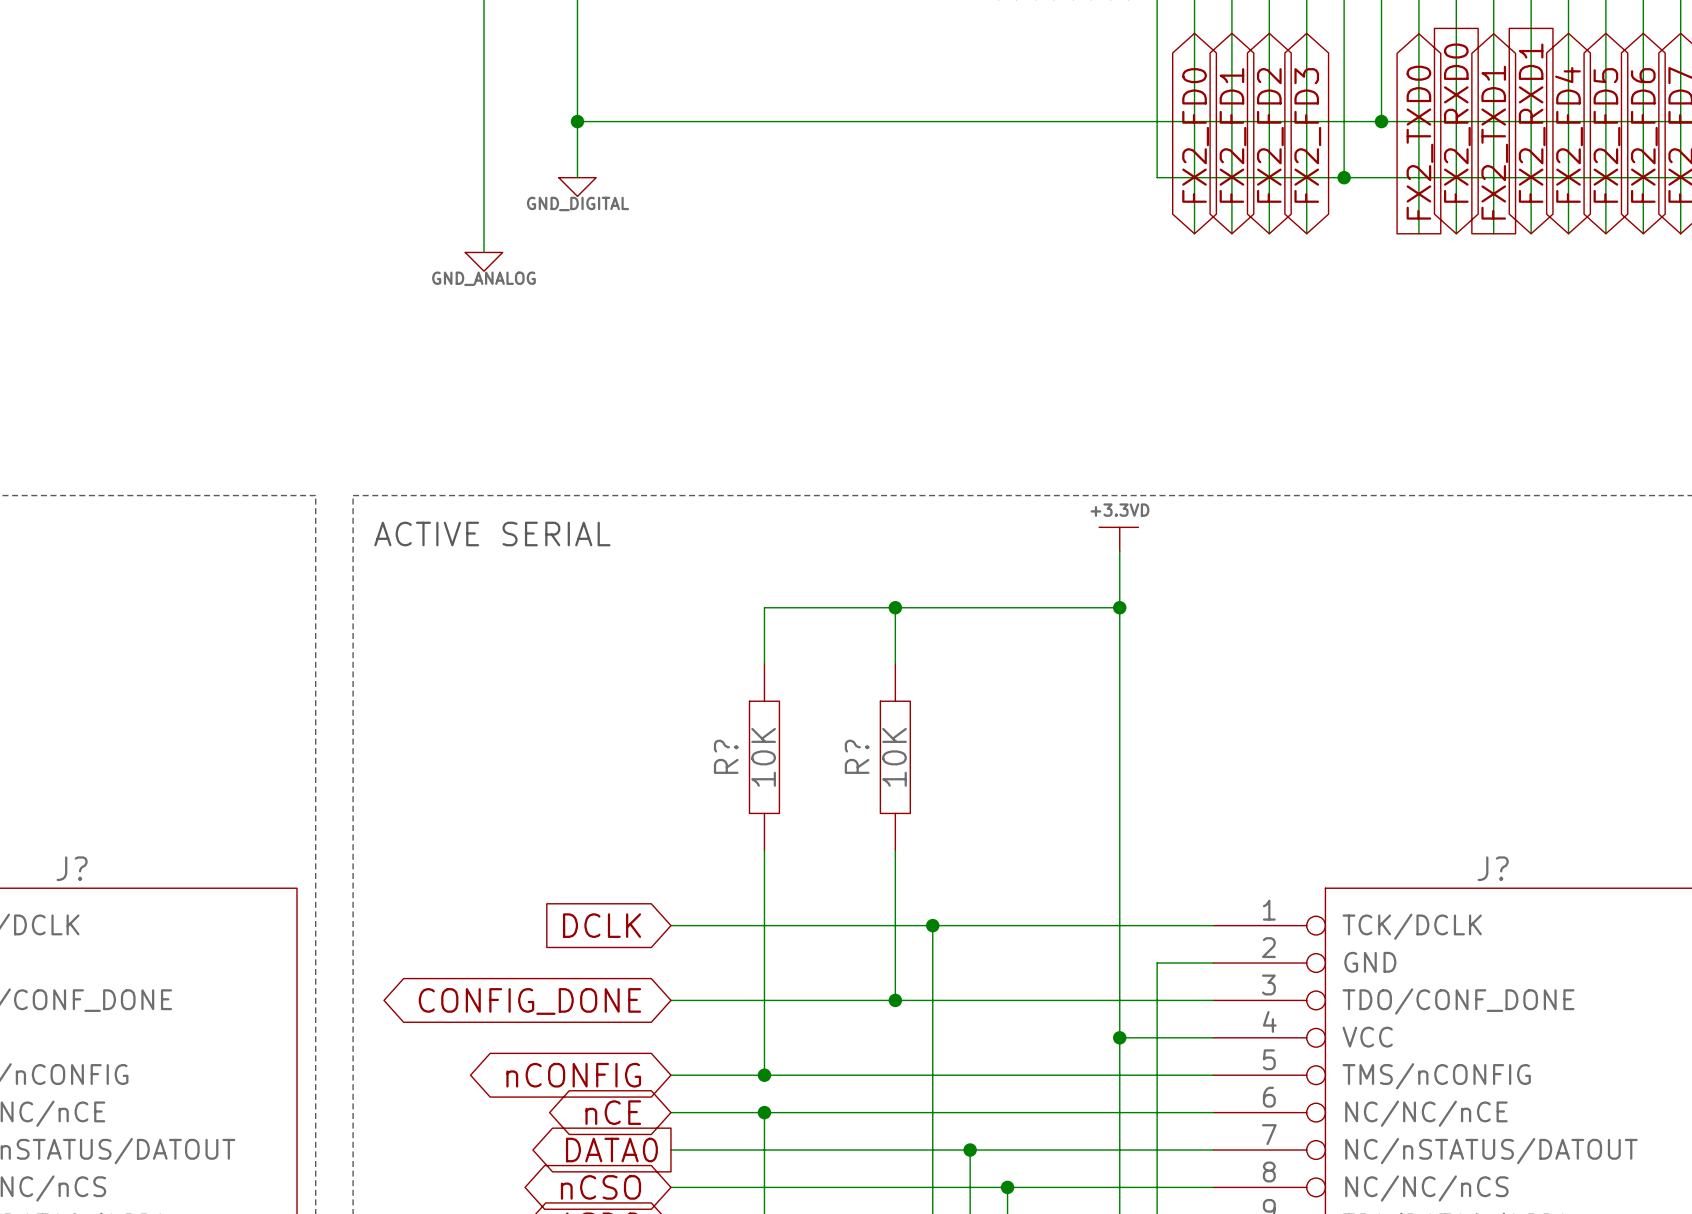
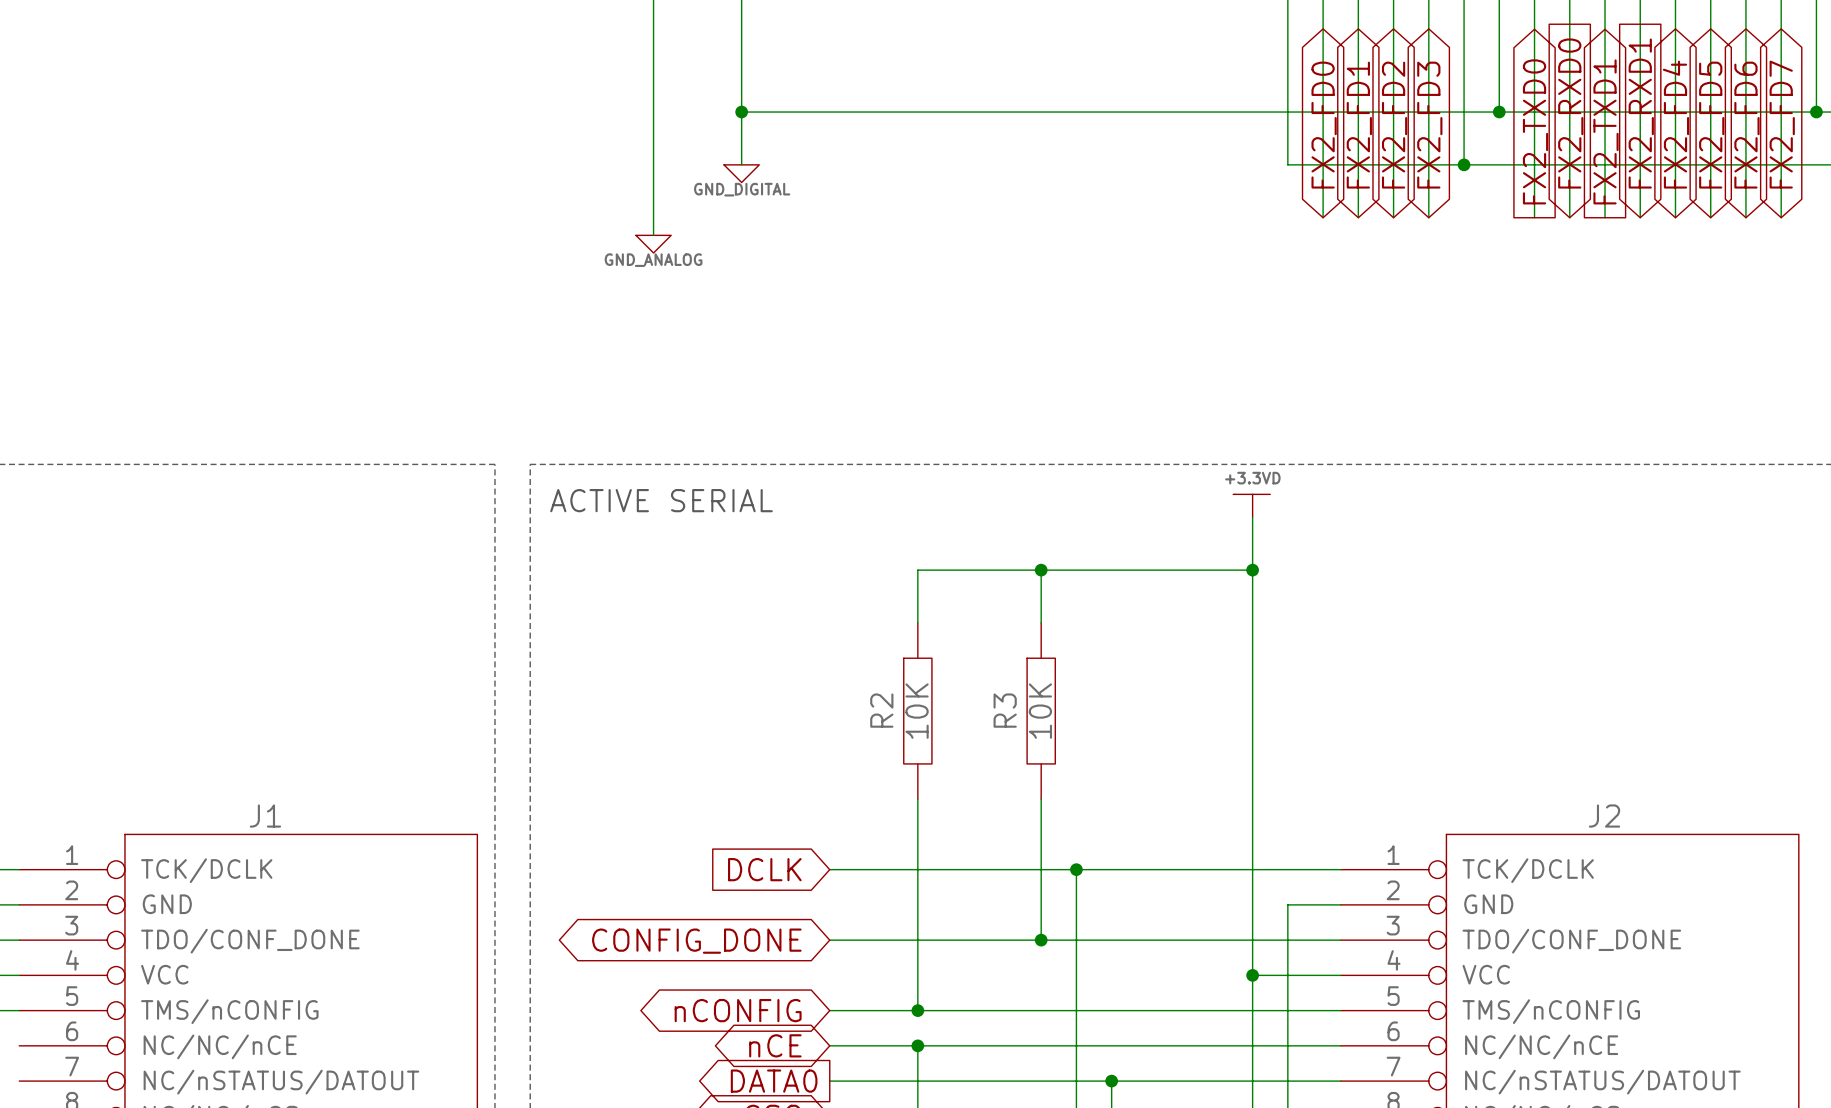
R? name: R? (726, 756) -> R2 (881, 710)
R? name: R? (857, 756) -> R3 (1005, 710)
J? name: J? (72, 868) -> J1 (265, 816)
J? name: J? (1493, 868) -> J2 (1604, 816)

